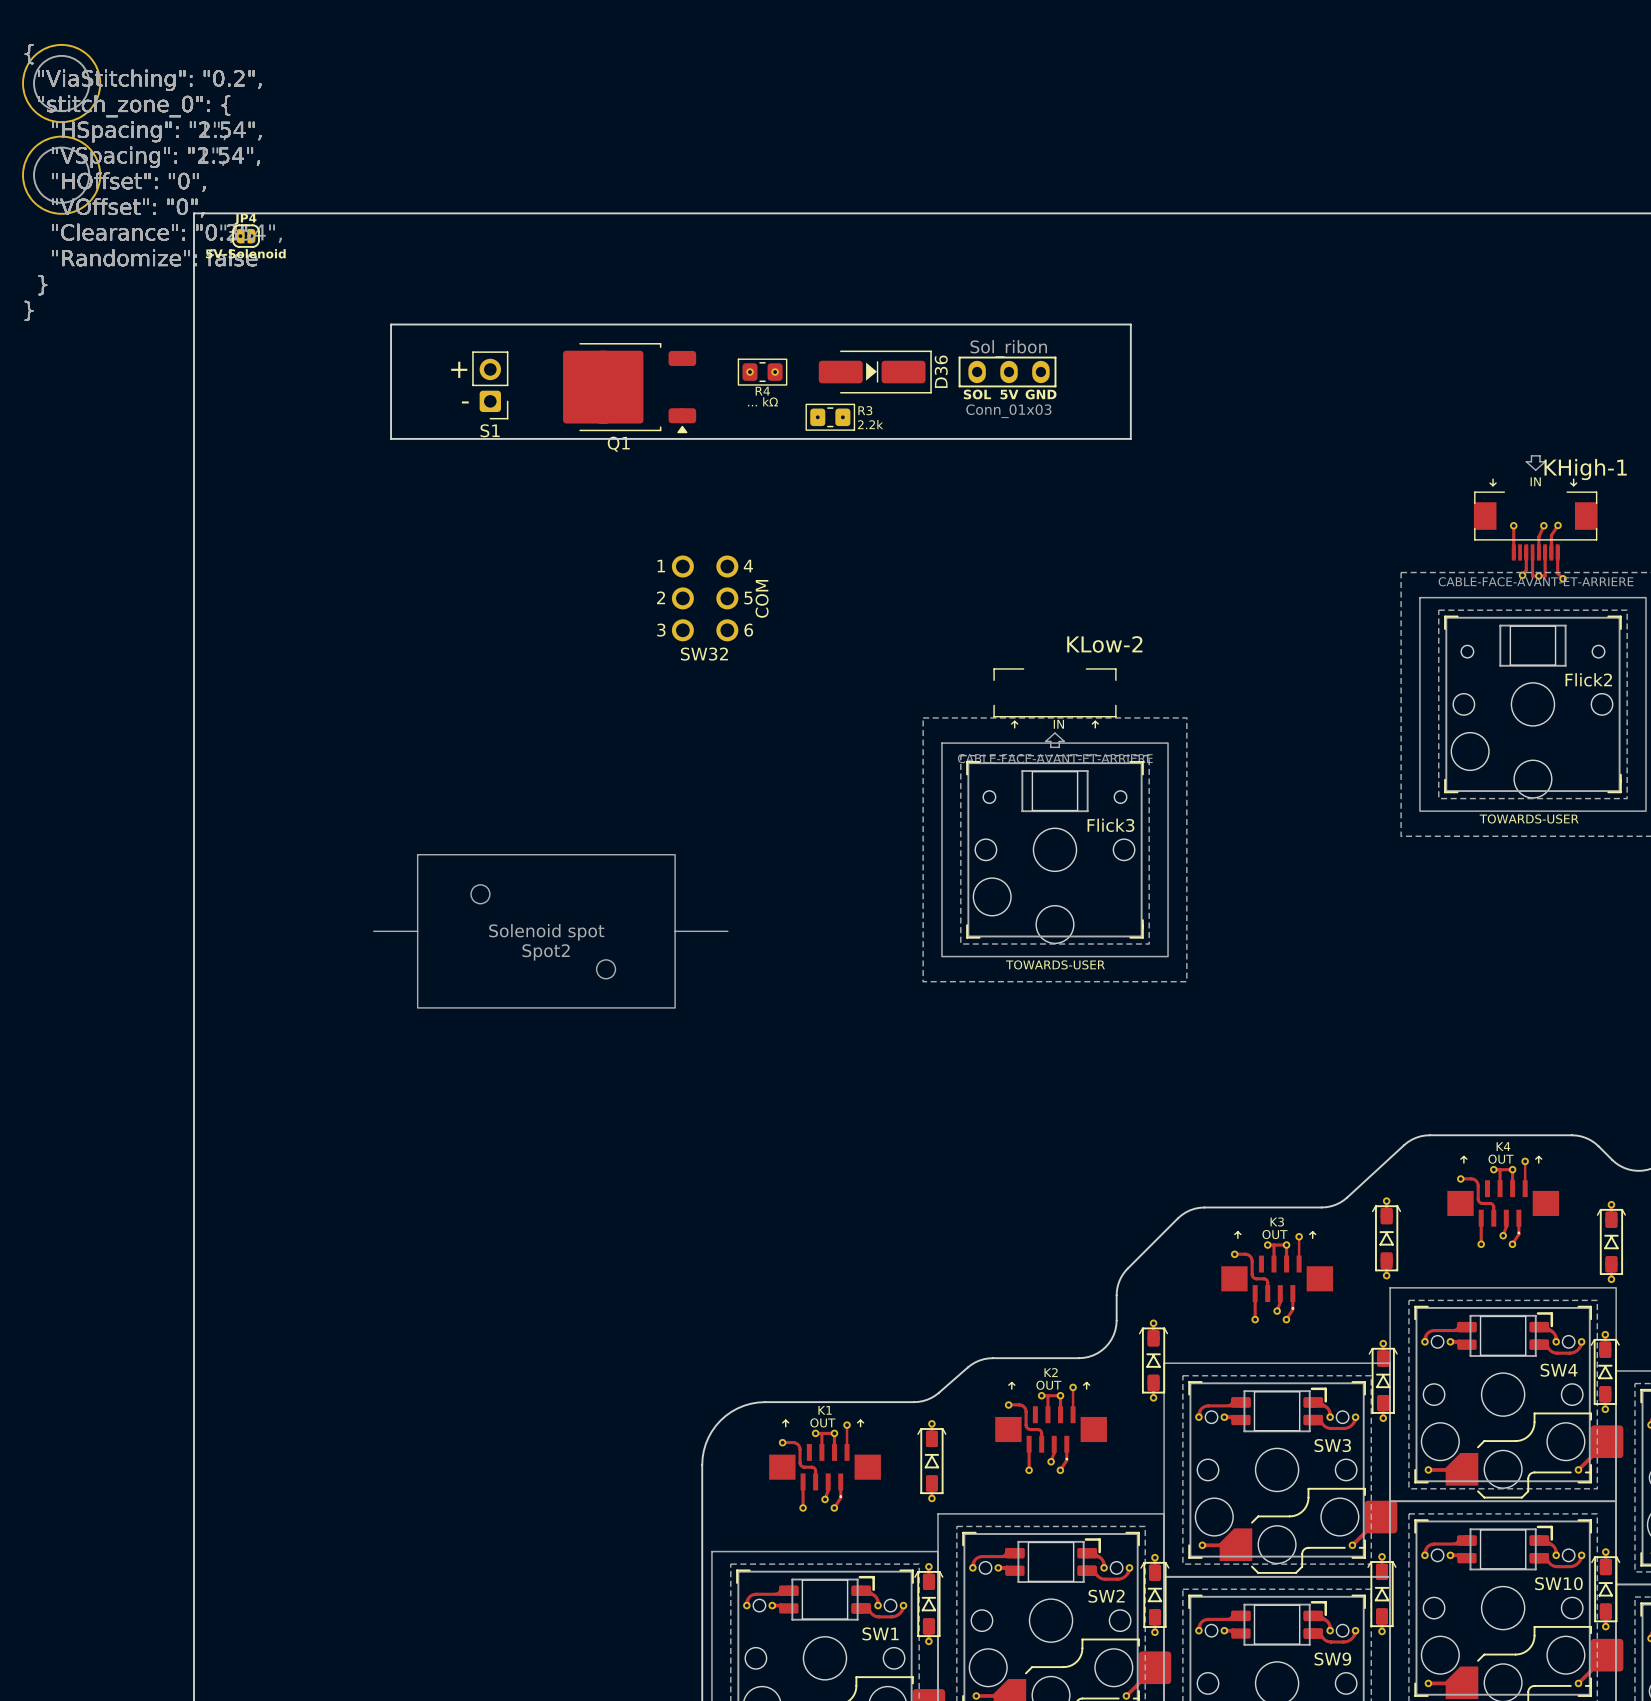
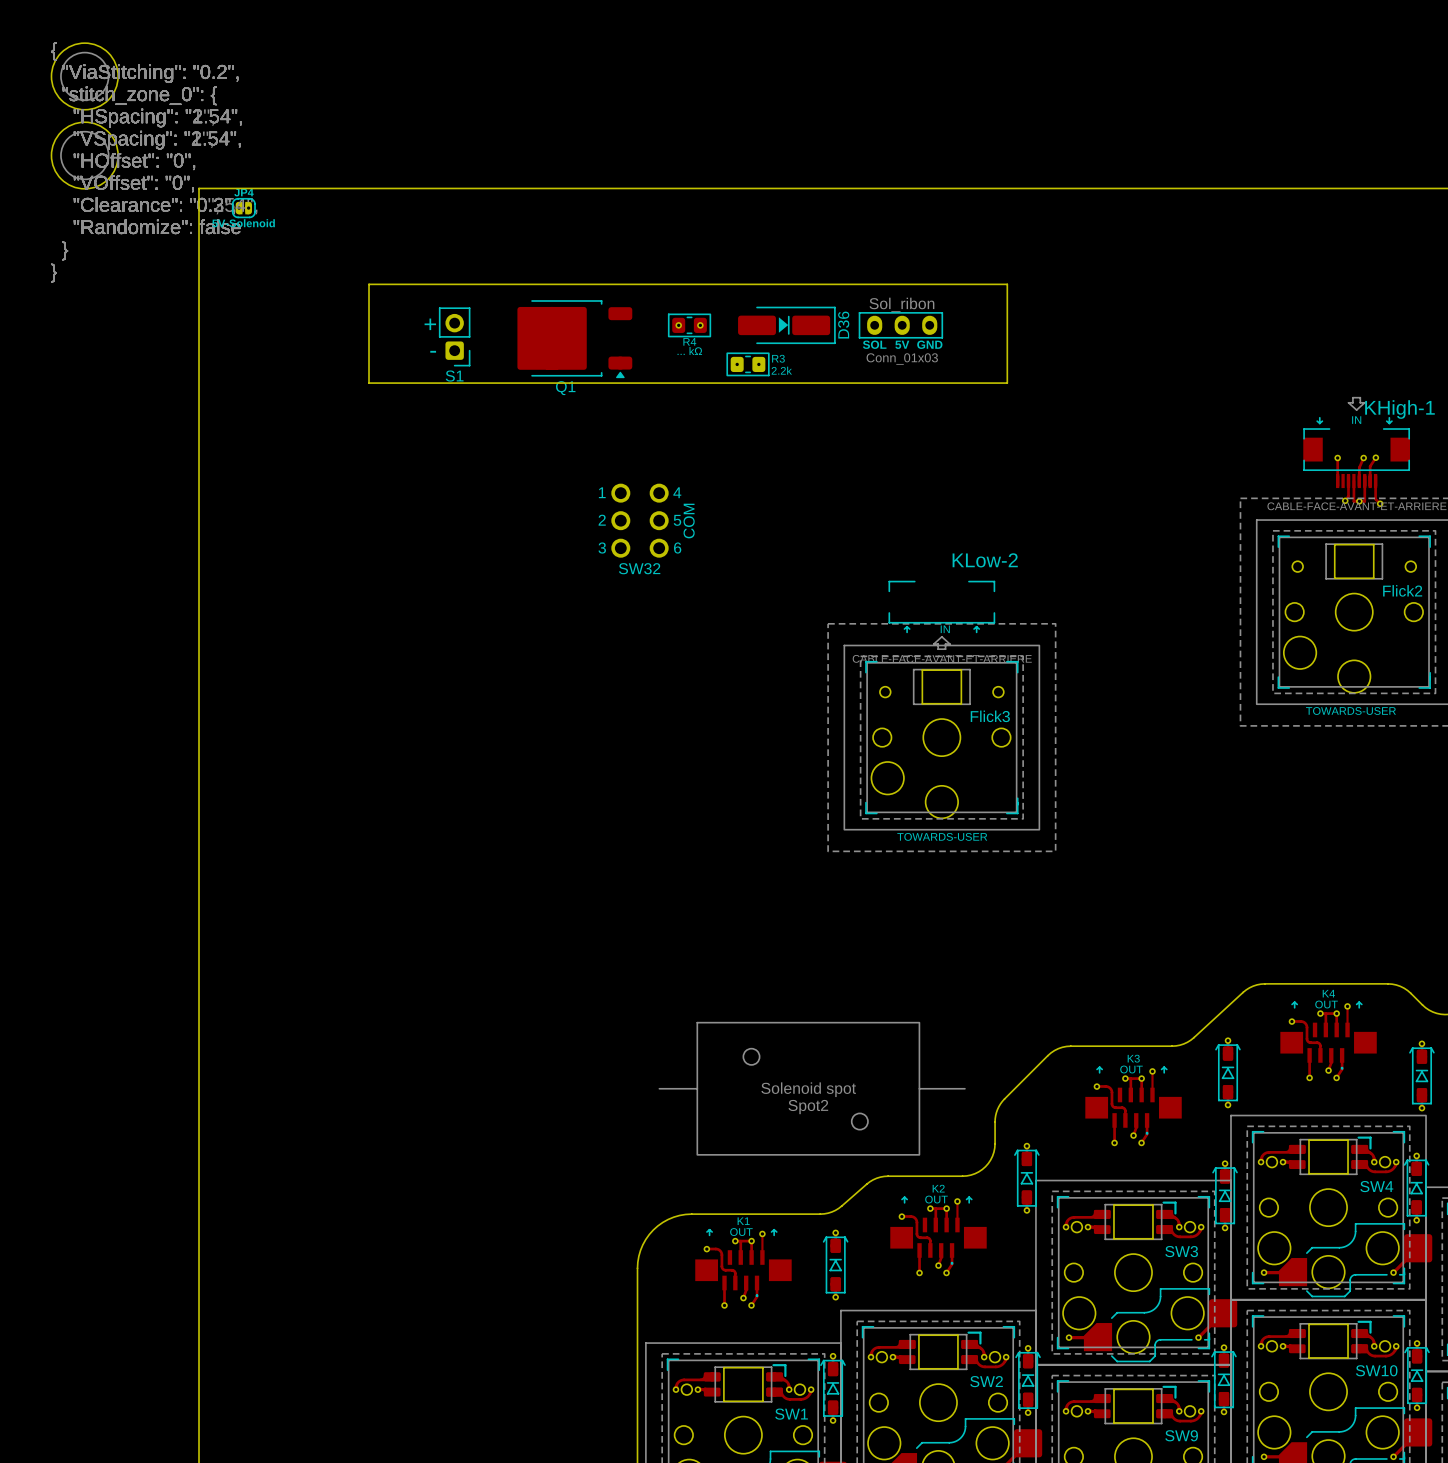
Spot2 position: (550, 931) -> (812, 1088)

